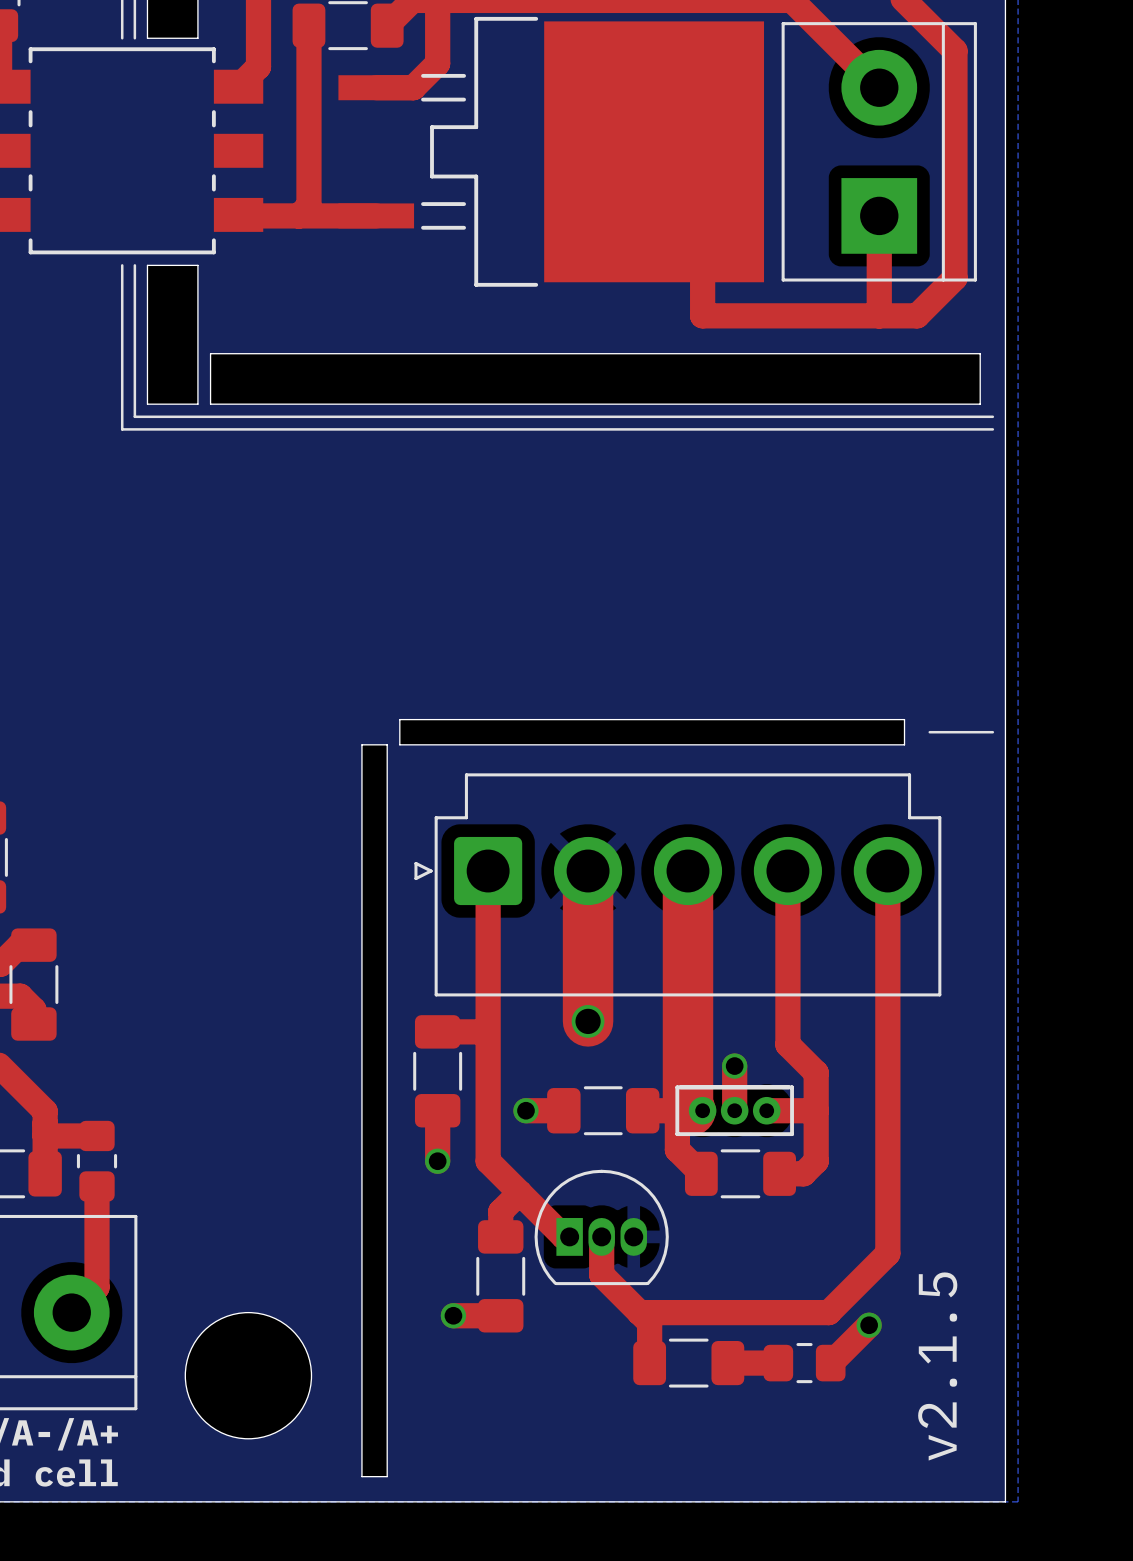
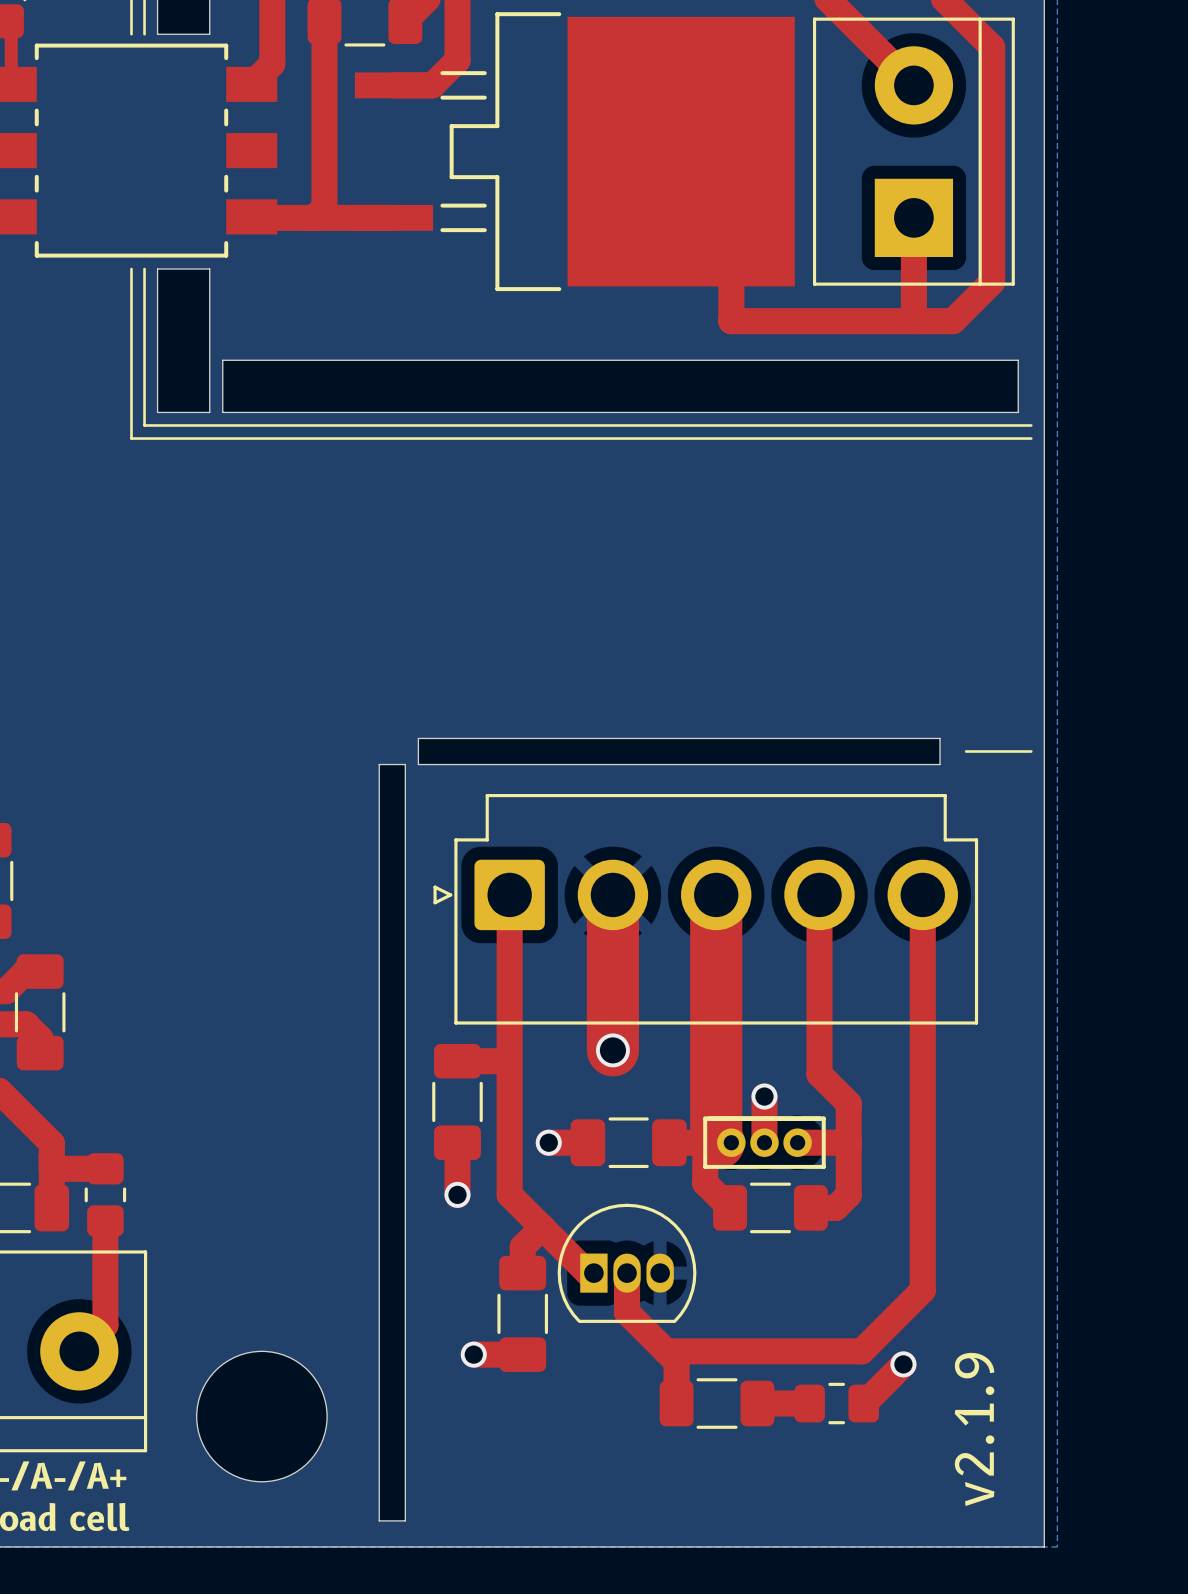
text: v2.1.5 (937, 1366) -> v2.1.9 (974, 1429)

